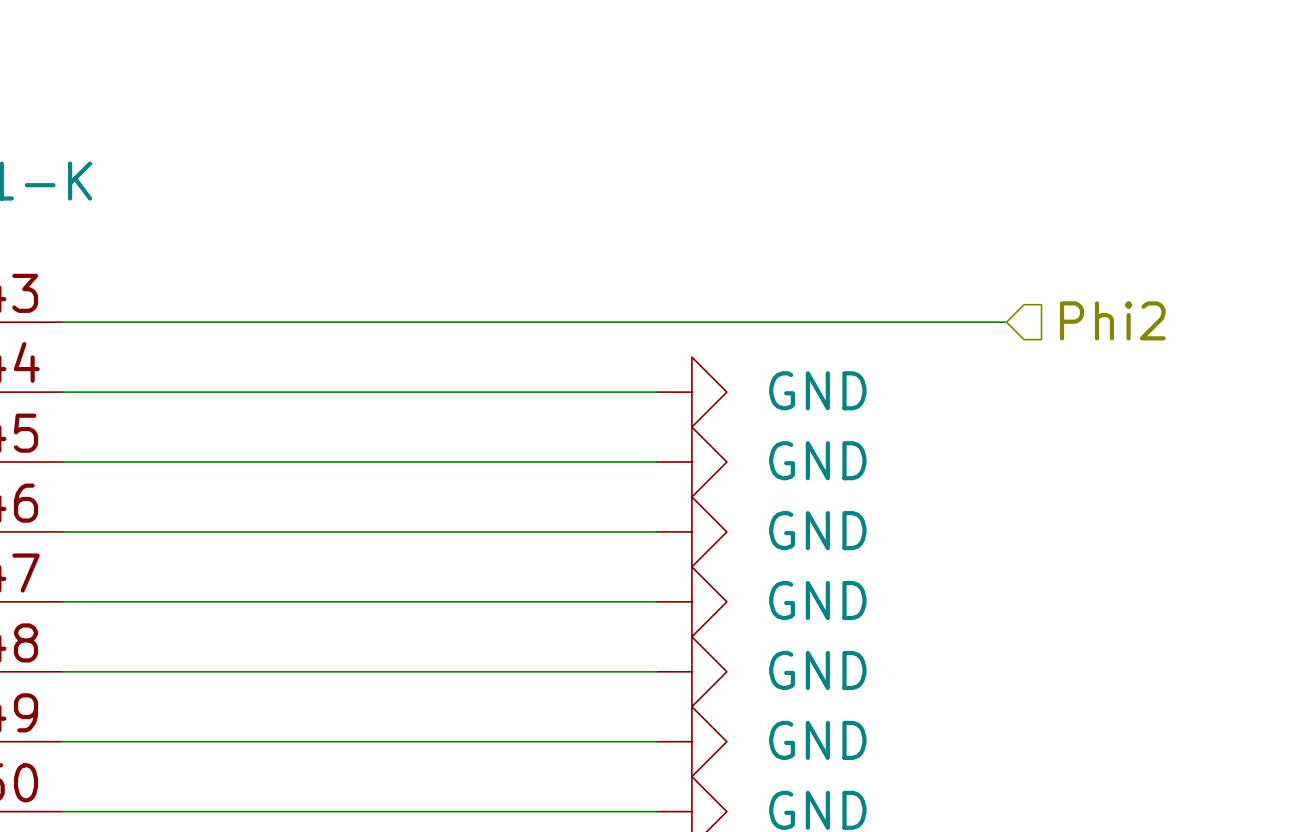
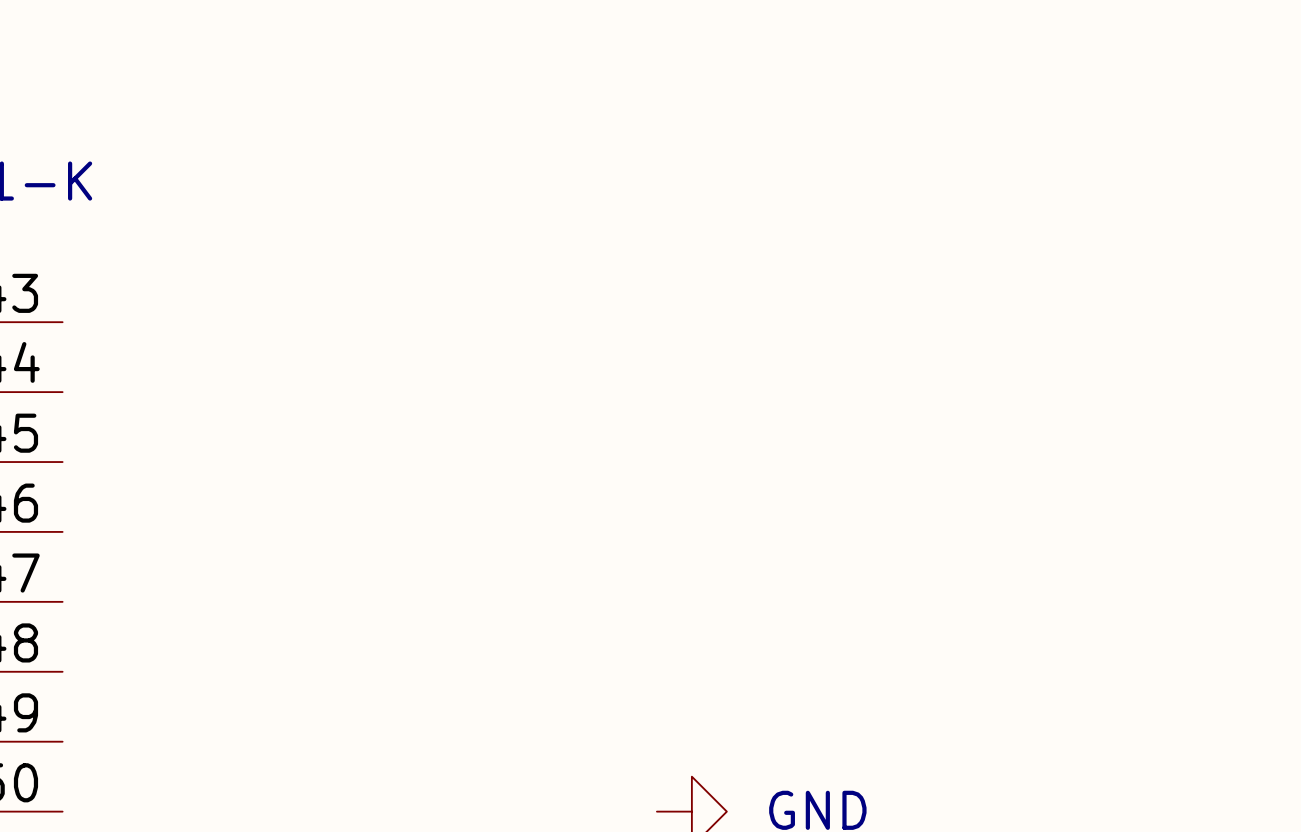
hierarchical label: Phi2 (1112, 320) -> none
wire: (62, 322) (1006, 322) -> none
wire: (62, 392) (656, 392) -> none
power symbol: GND (691, 392) -> none
wire: (62, 462) (656, 462) -> none
power symbol: GND (691, 462) -> none
wire: (62, 531) (656, 531) -> none
power symbol: GND (691, 531) -> none
wire: (62, 601) (656, 601) -> none
power symbol: GND (691, 601) -> none
wire: (62, 671) (656, 671) -> none
power symbol: GND (691, 671) -> none
wire: (62, 741) (656, 741) -> none
power symbol: GND (691, 741) -> none
wire: (62, 811) (656, 811) -> none

